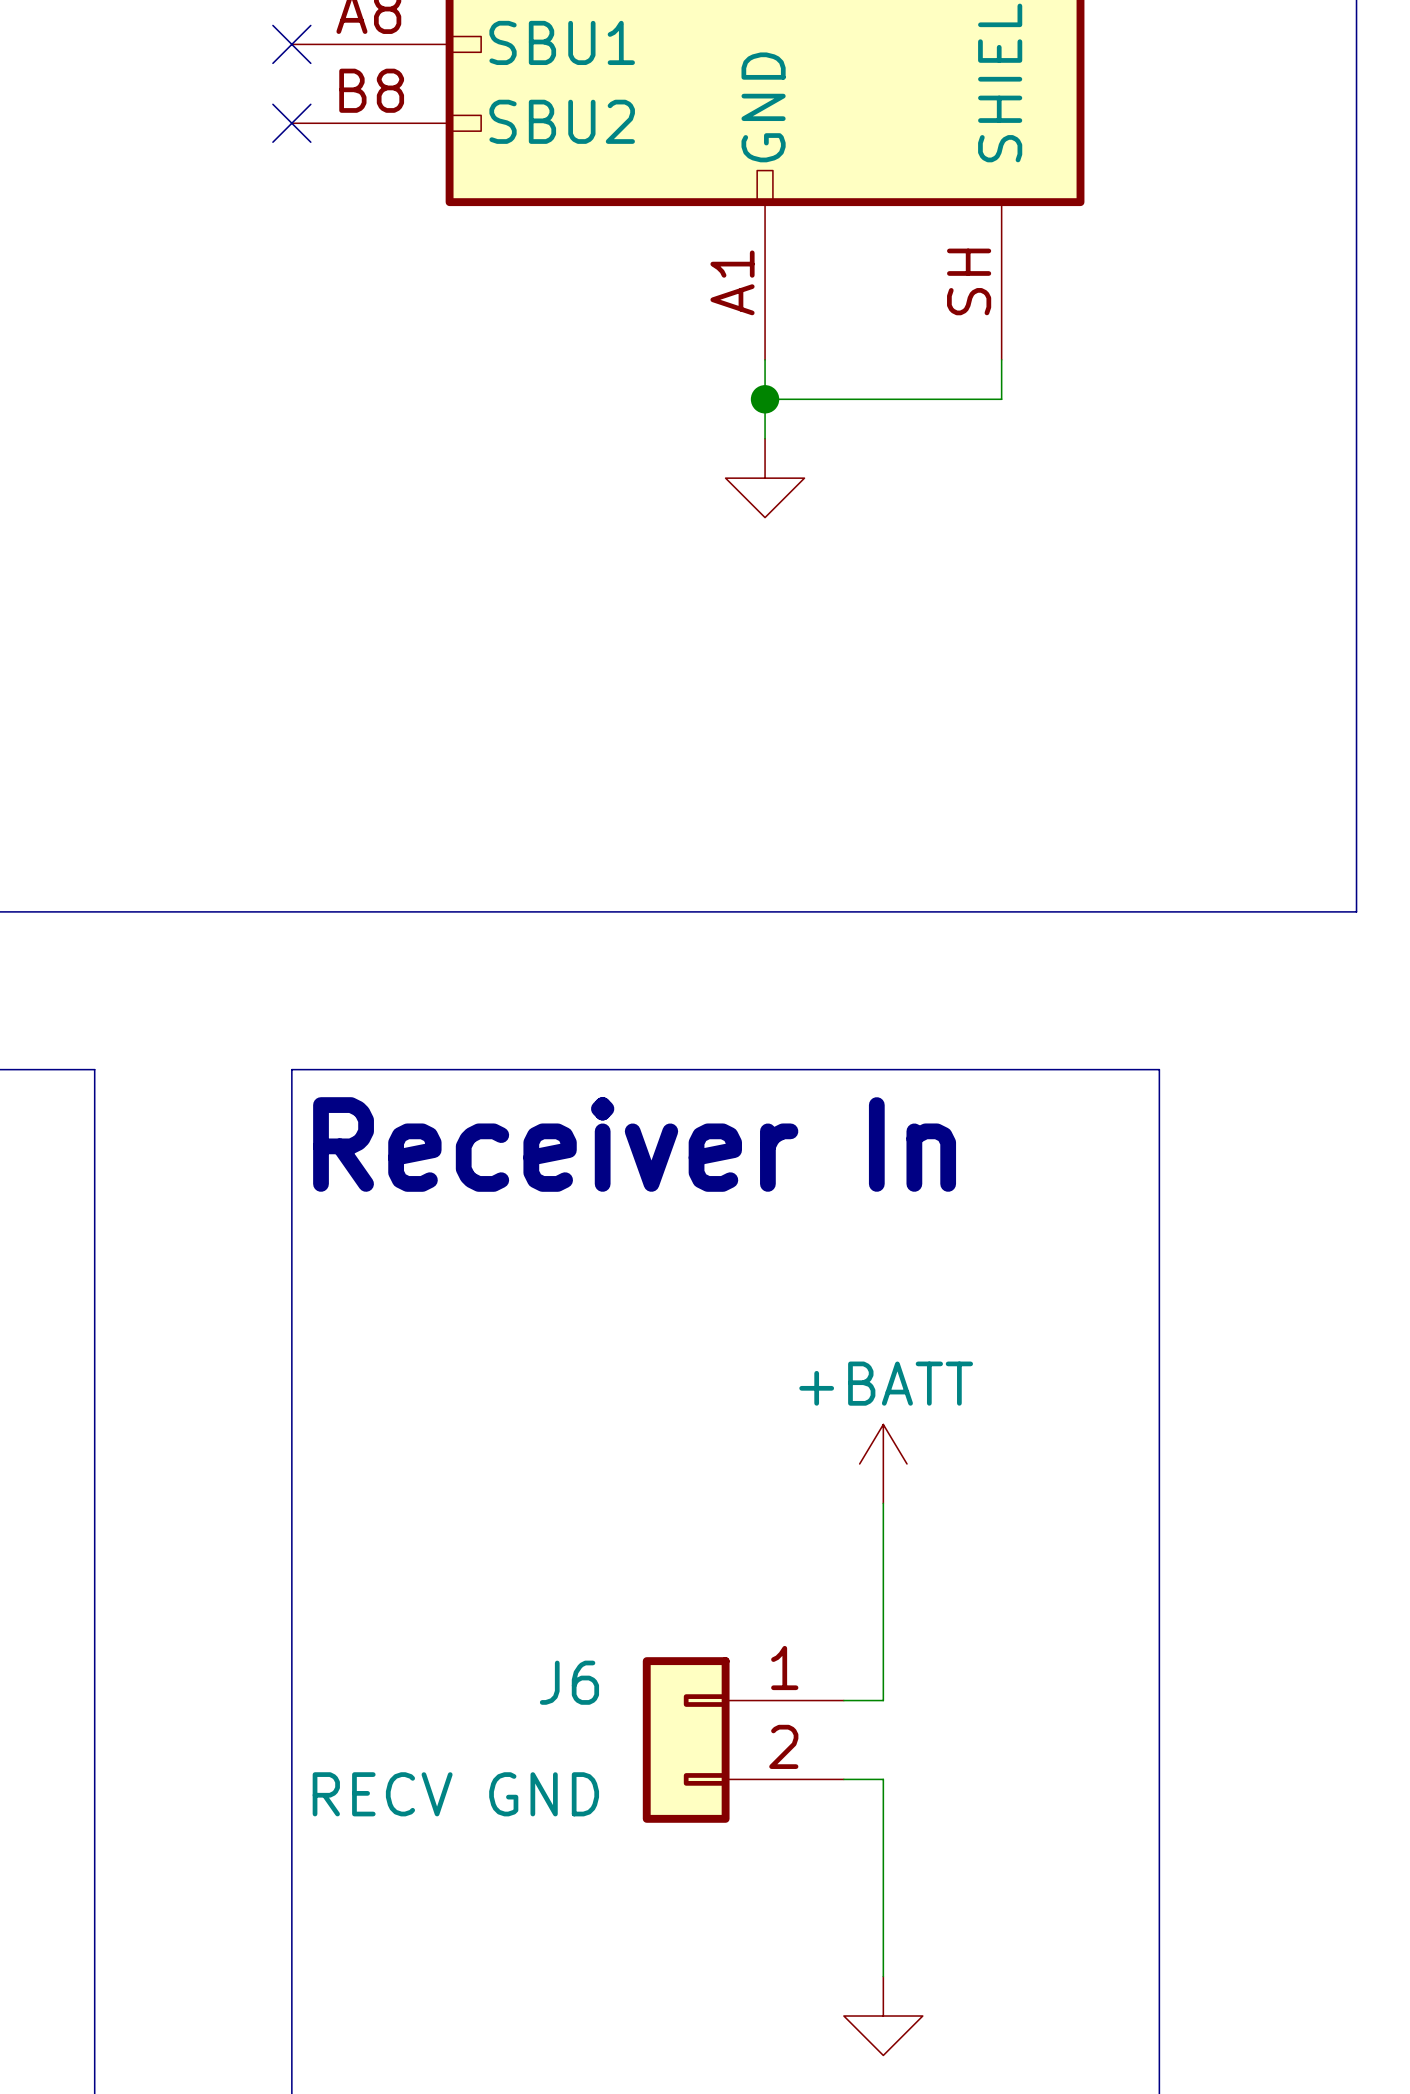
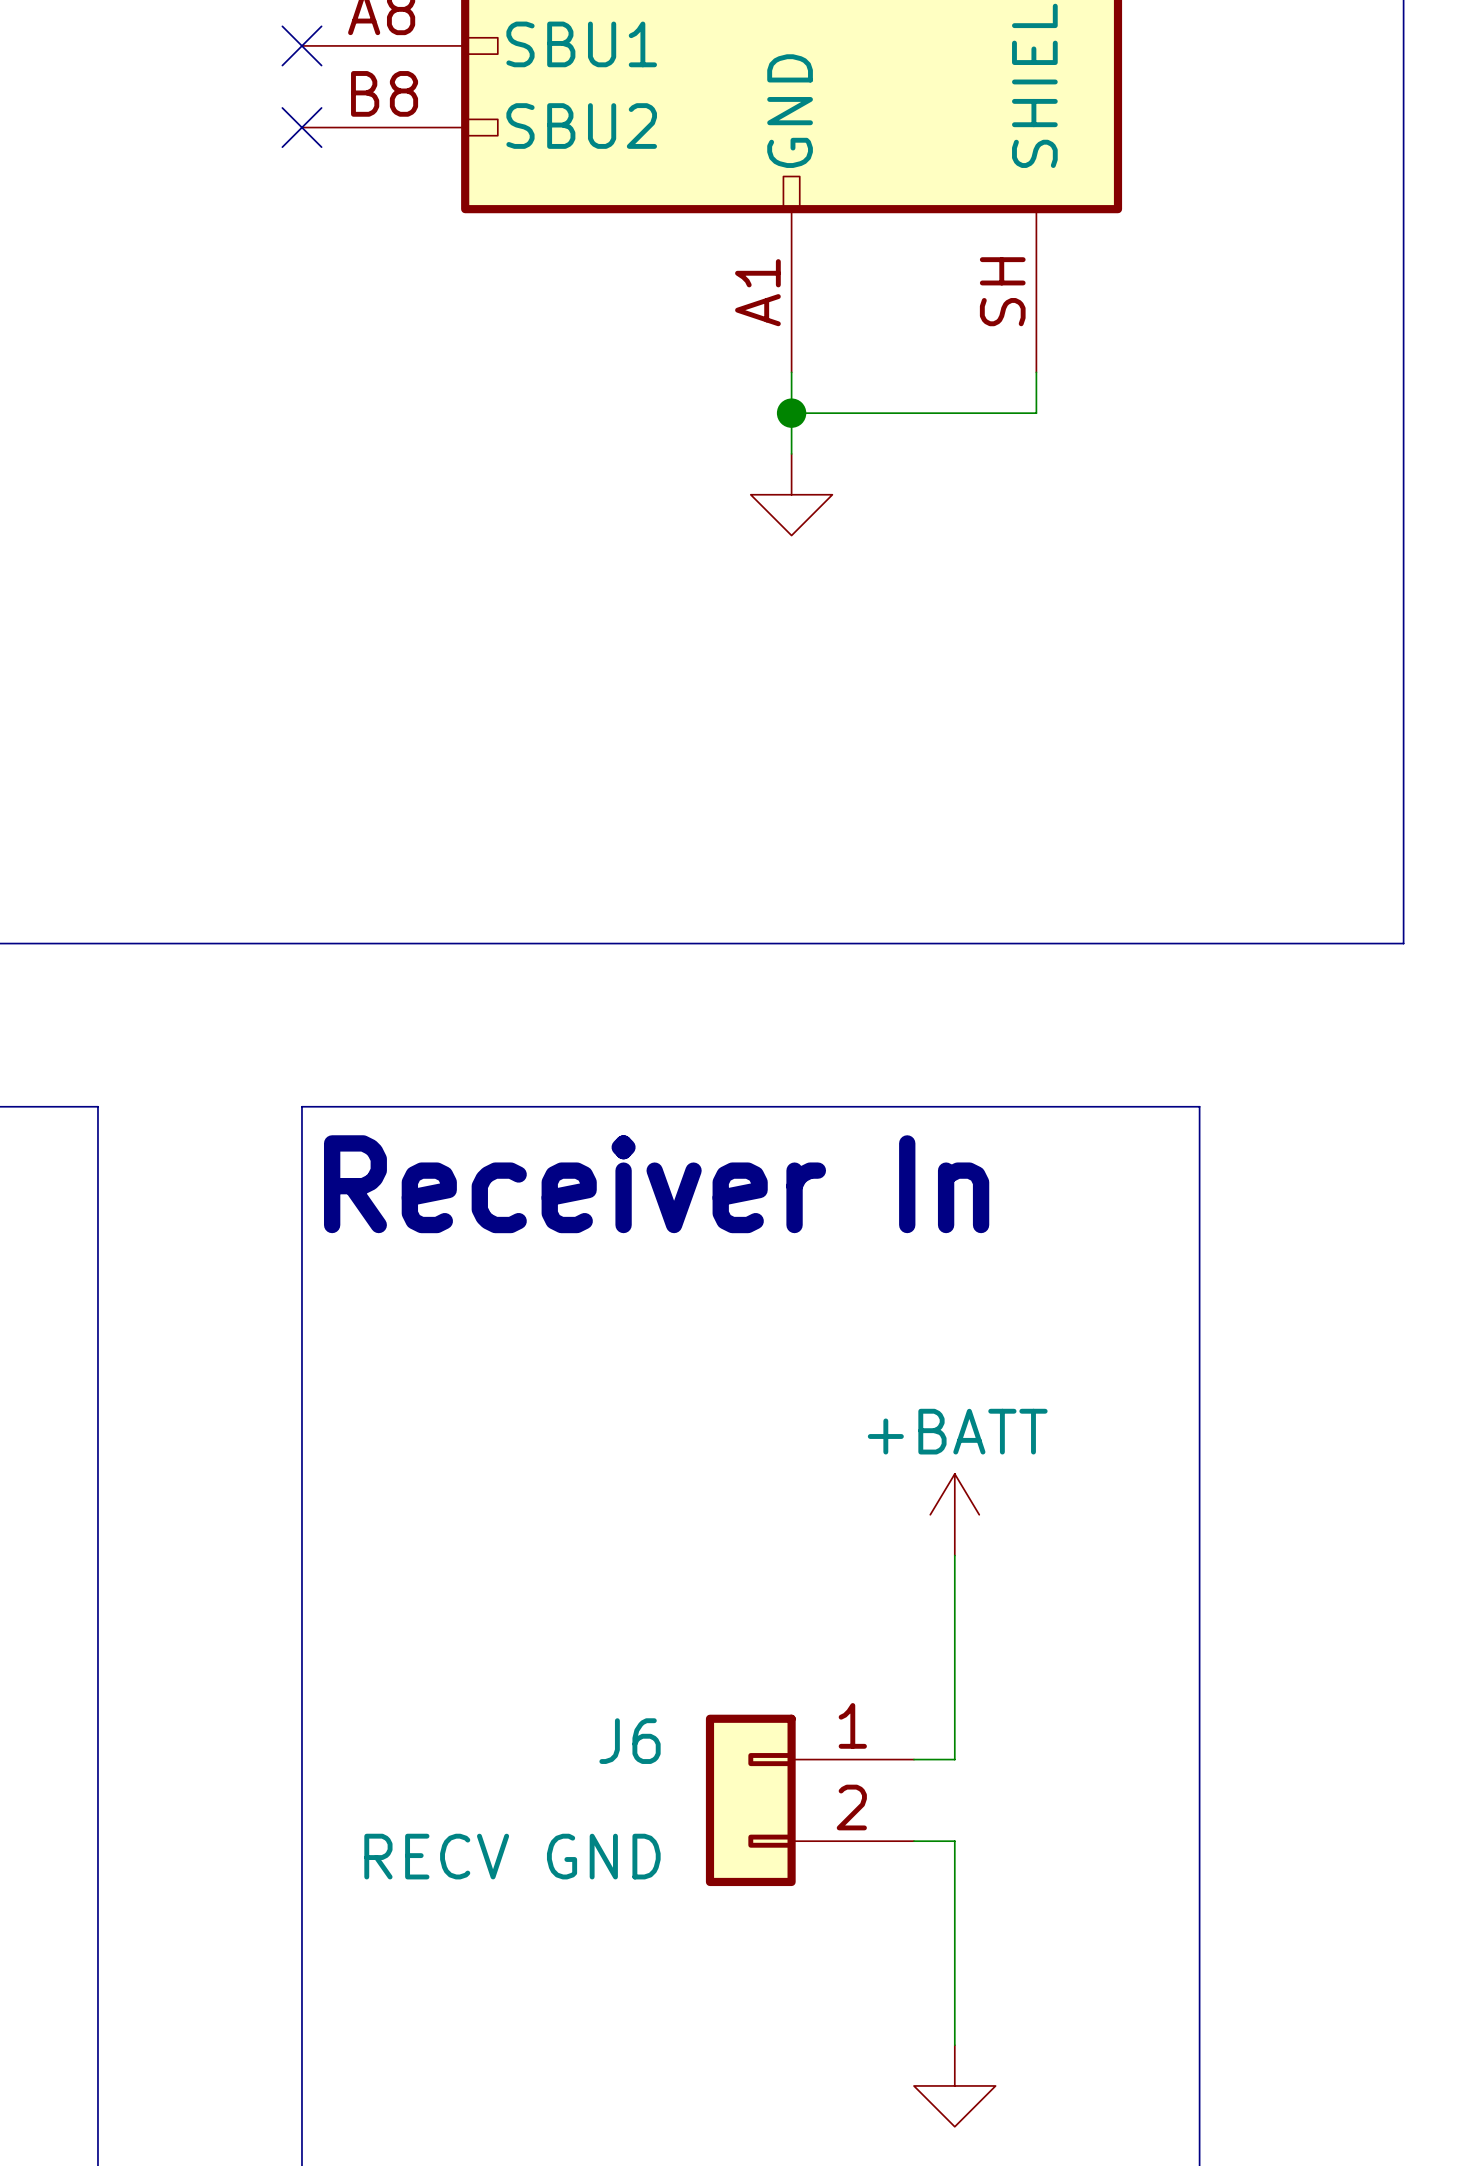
power symbol position: +BATT (883, 1463) -> +BATT (954, 1514)
wire: (883, 1503) (883, 1700) (843, 1700) -> (954, 1555) (954, 1759) (913, 1759)
J6 position: (743, 1739) -> (809, 1800)
wire: (843, 1779) (883, 1779) (883, 1976) -> (913, 1841) (954, 1841) (954, 2045)
power symbol position: (883, 2016) -> (954, 2085)

